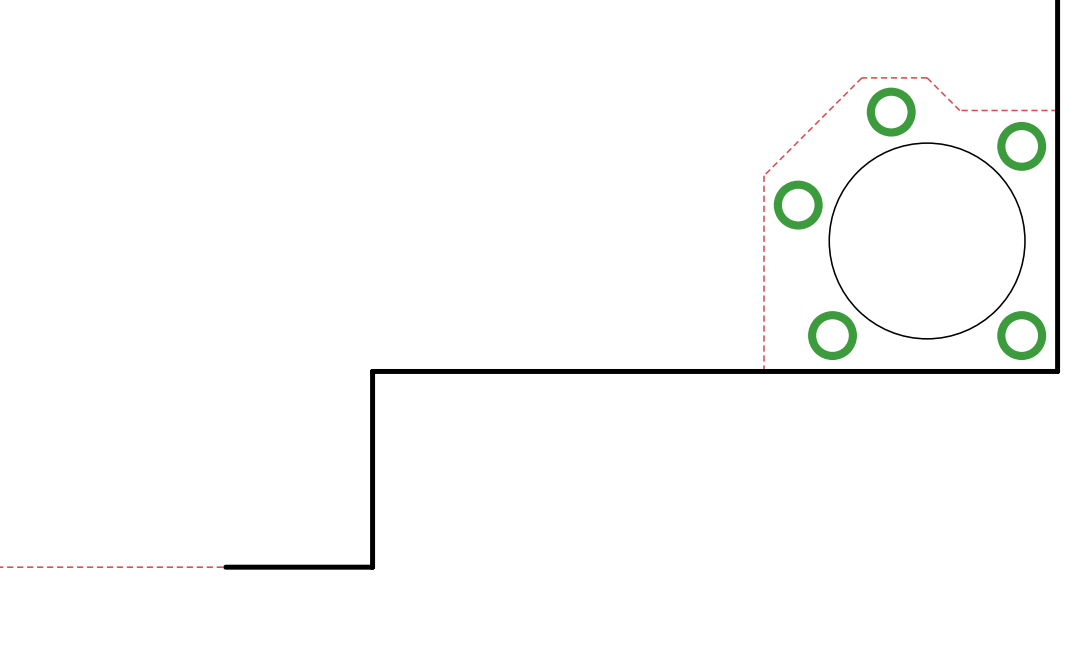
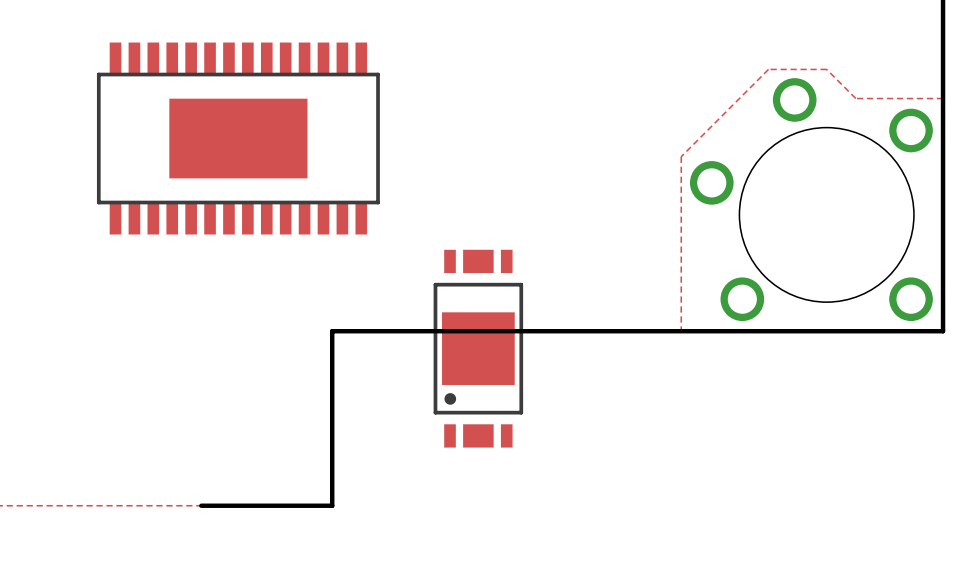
part: none -> (238, 138)
part: none -> (478, 348)

